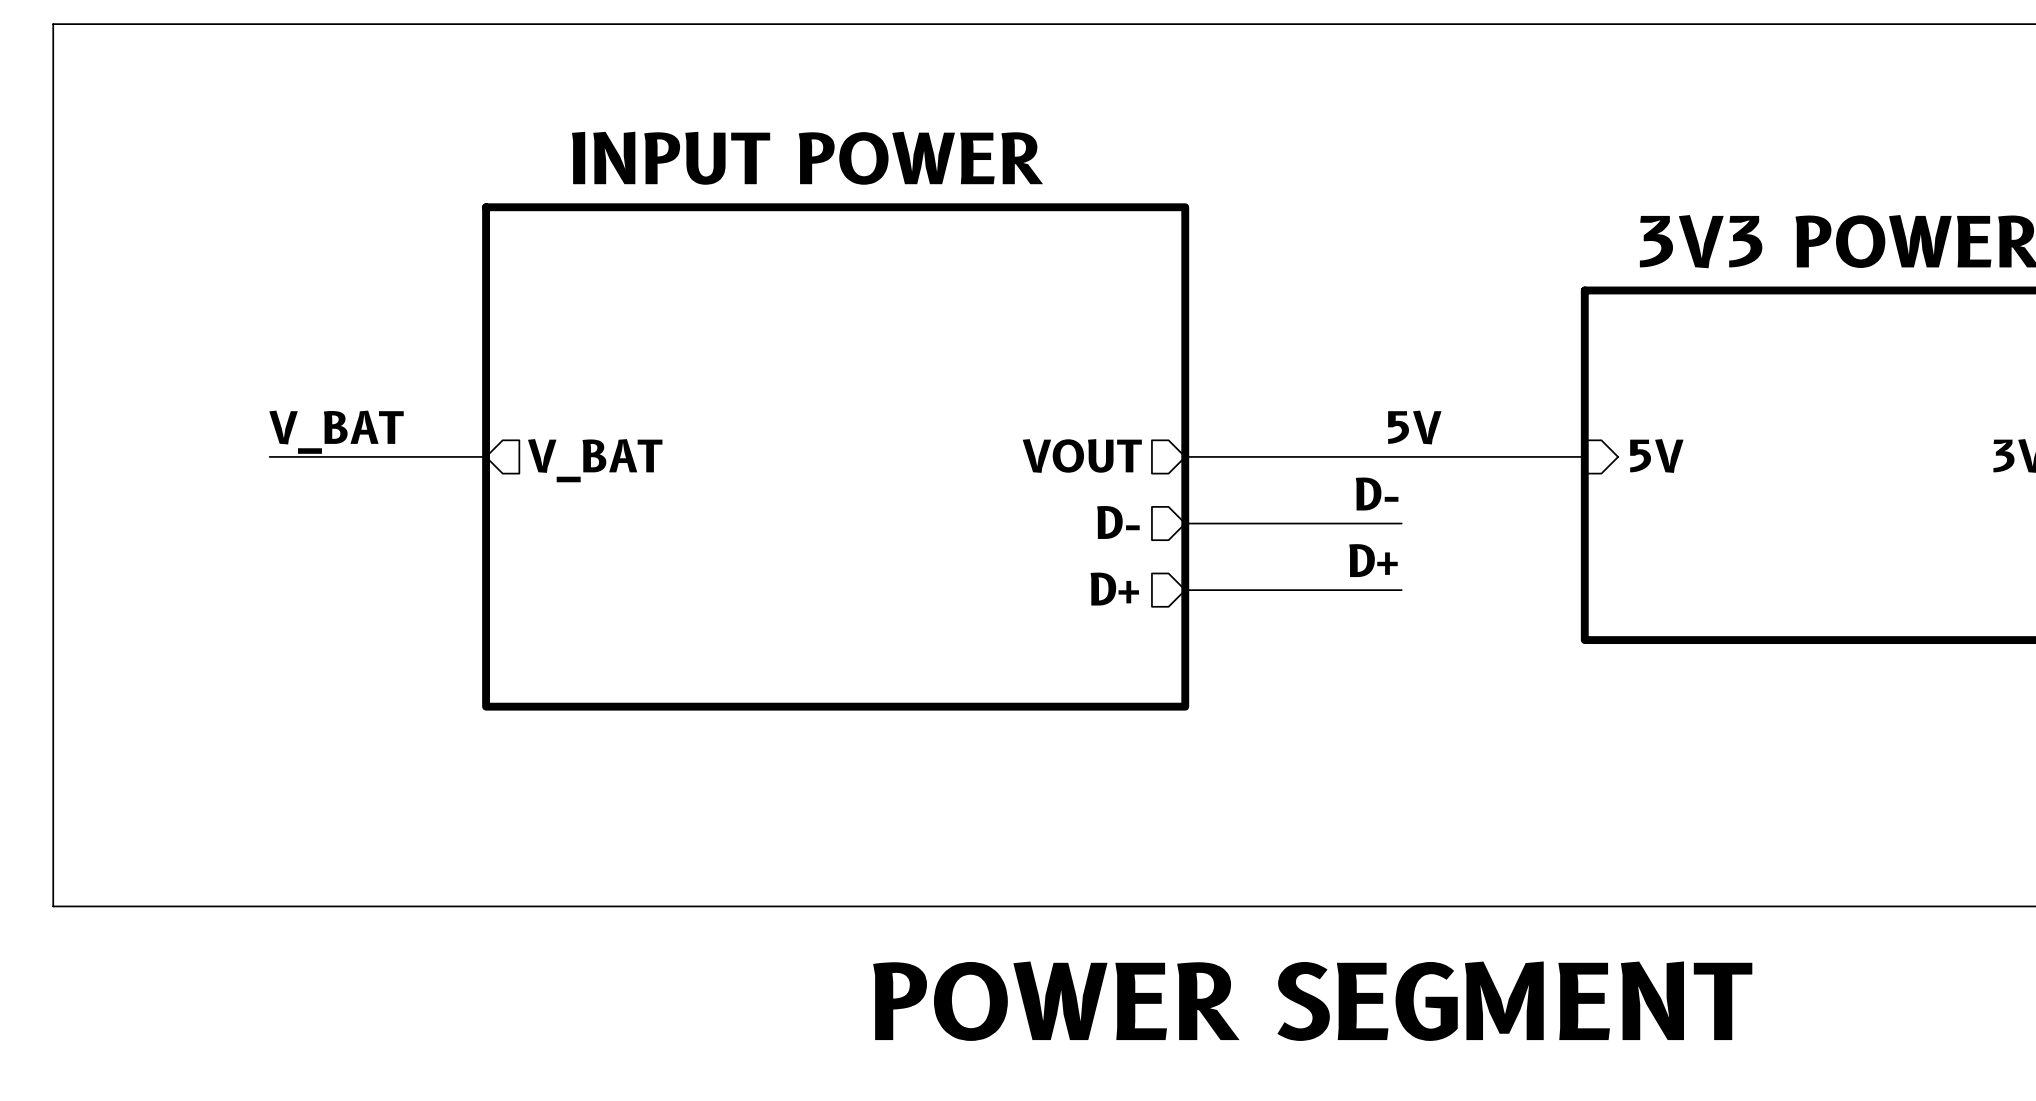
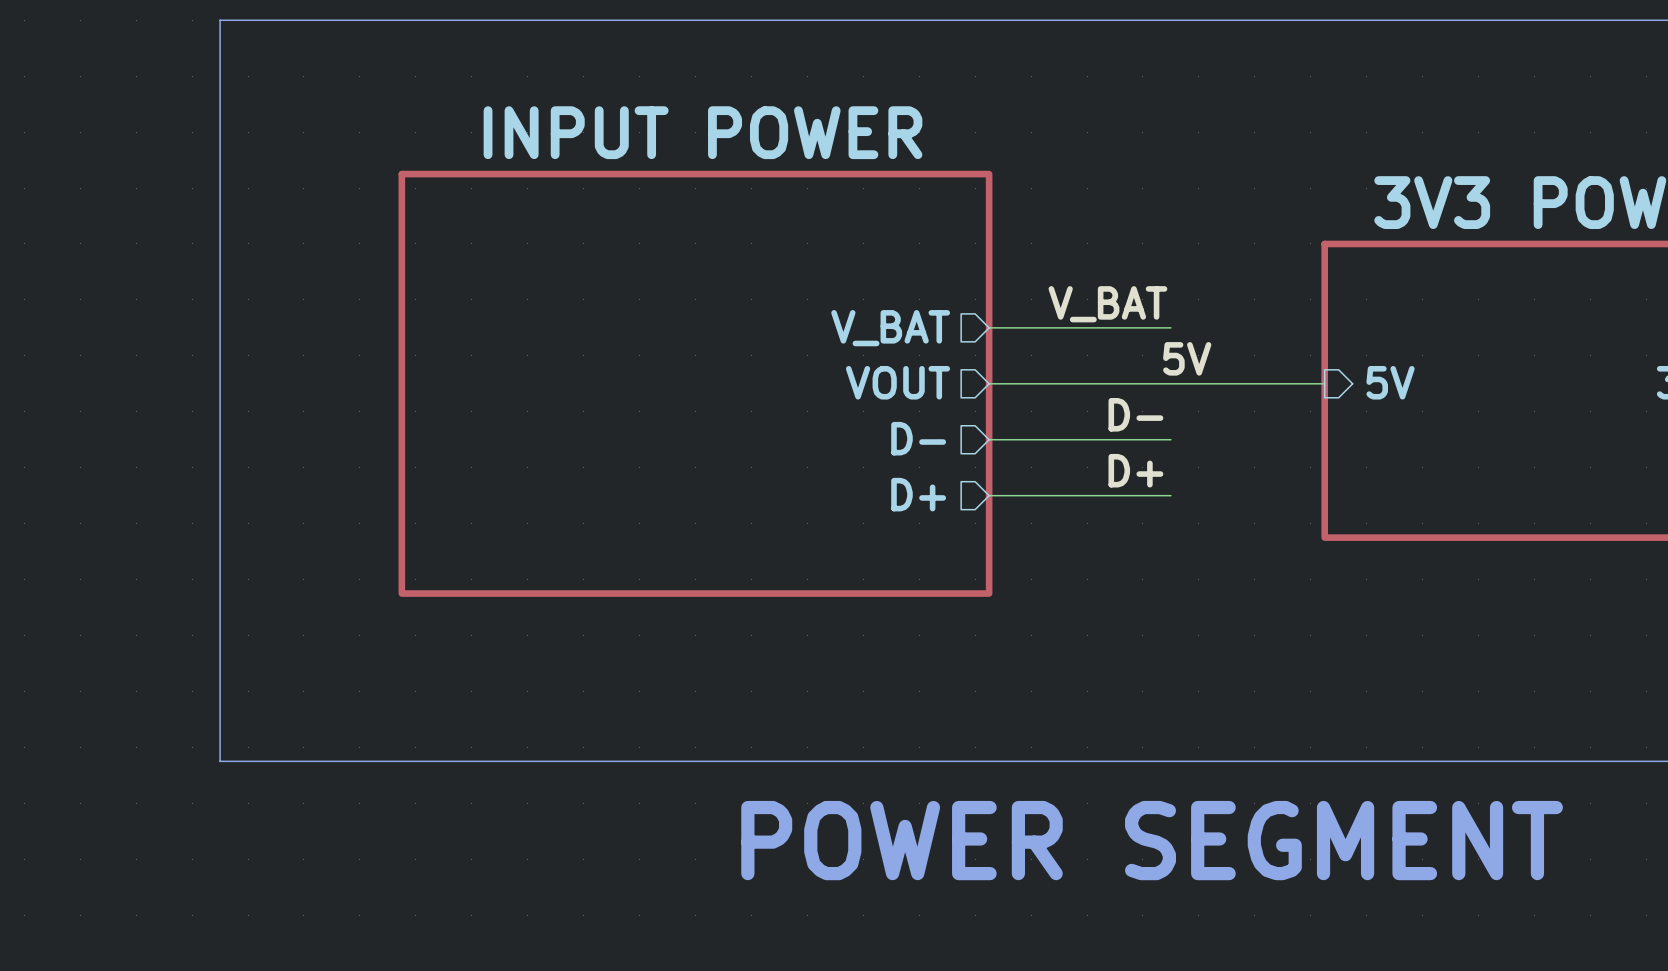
bus: (269, 24) (53, 24) (53, 906) (269, 906) -> (220, 20) (220, 761)
label: none -> V_BAT (1107, 304)
wire: none -> (989, 327) (1170, 327)
label: V_BAT (336, 432) -> none
wire: (269, 456) (486, 456) -> none
sheet pin rotation: 0° (595, 460) -> 180° (890, 328)
sheet pin position: V_BAT (595, 460) -> V_BAT (890, 328)

